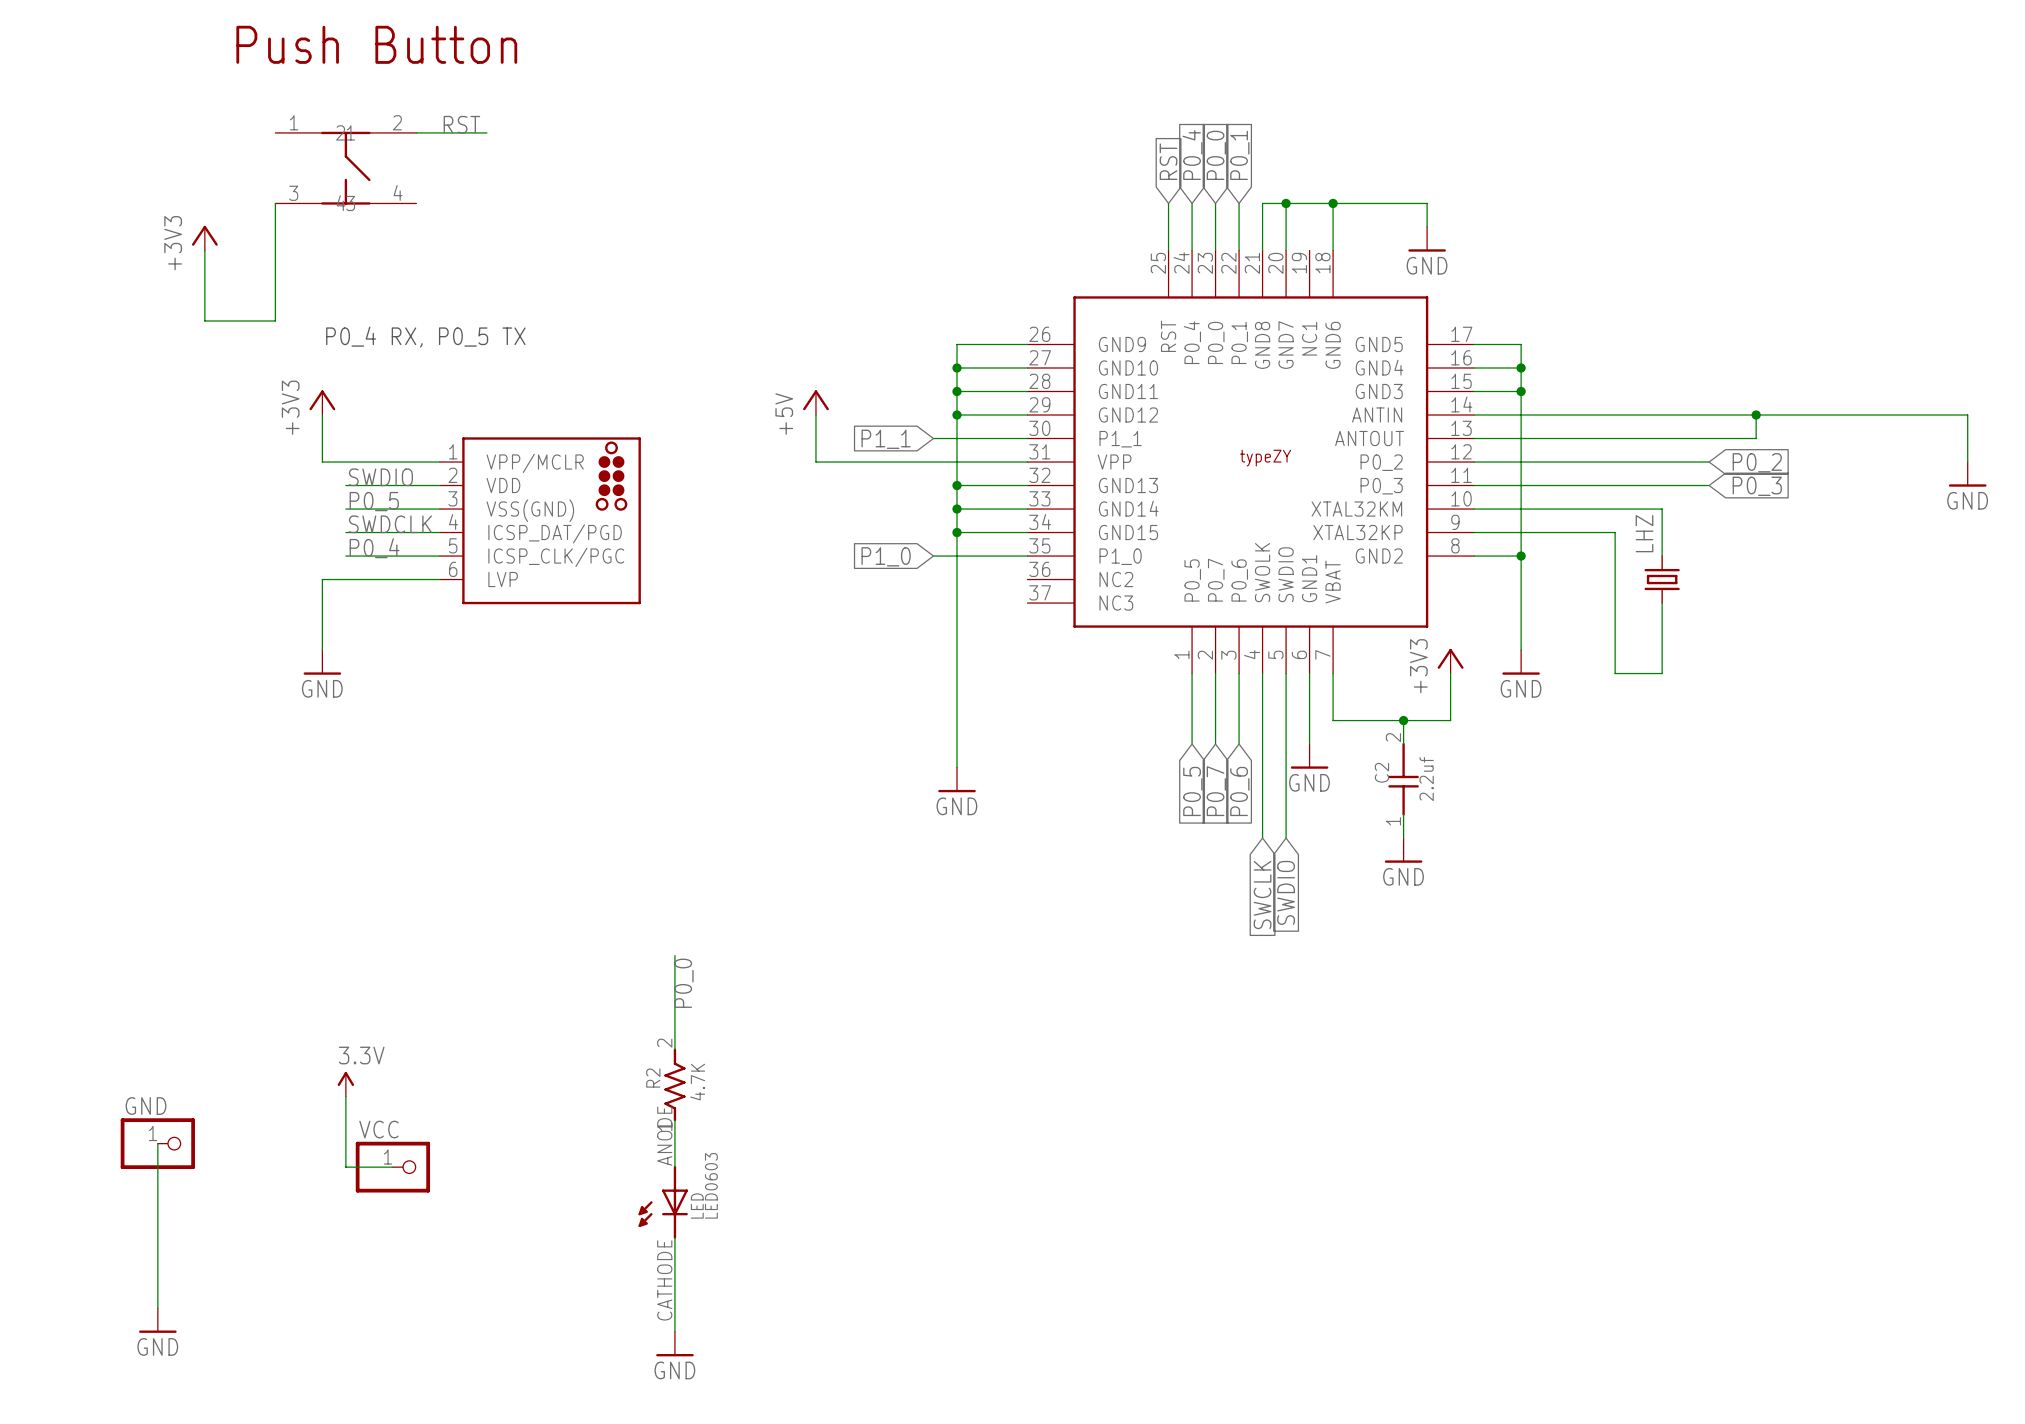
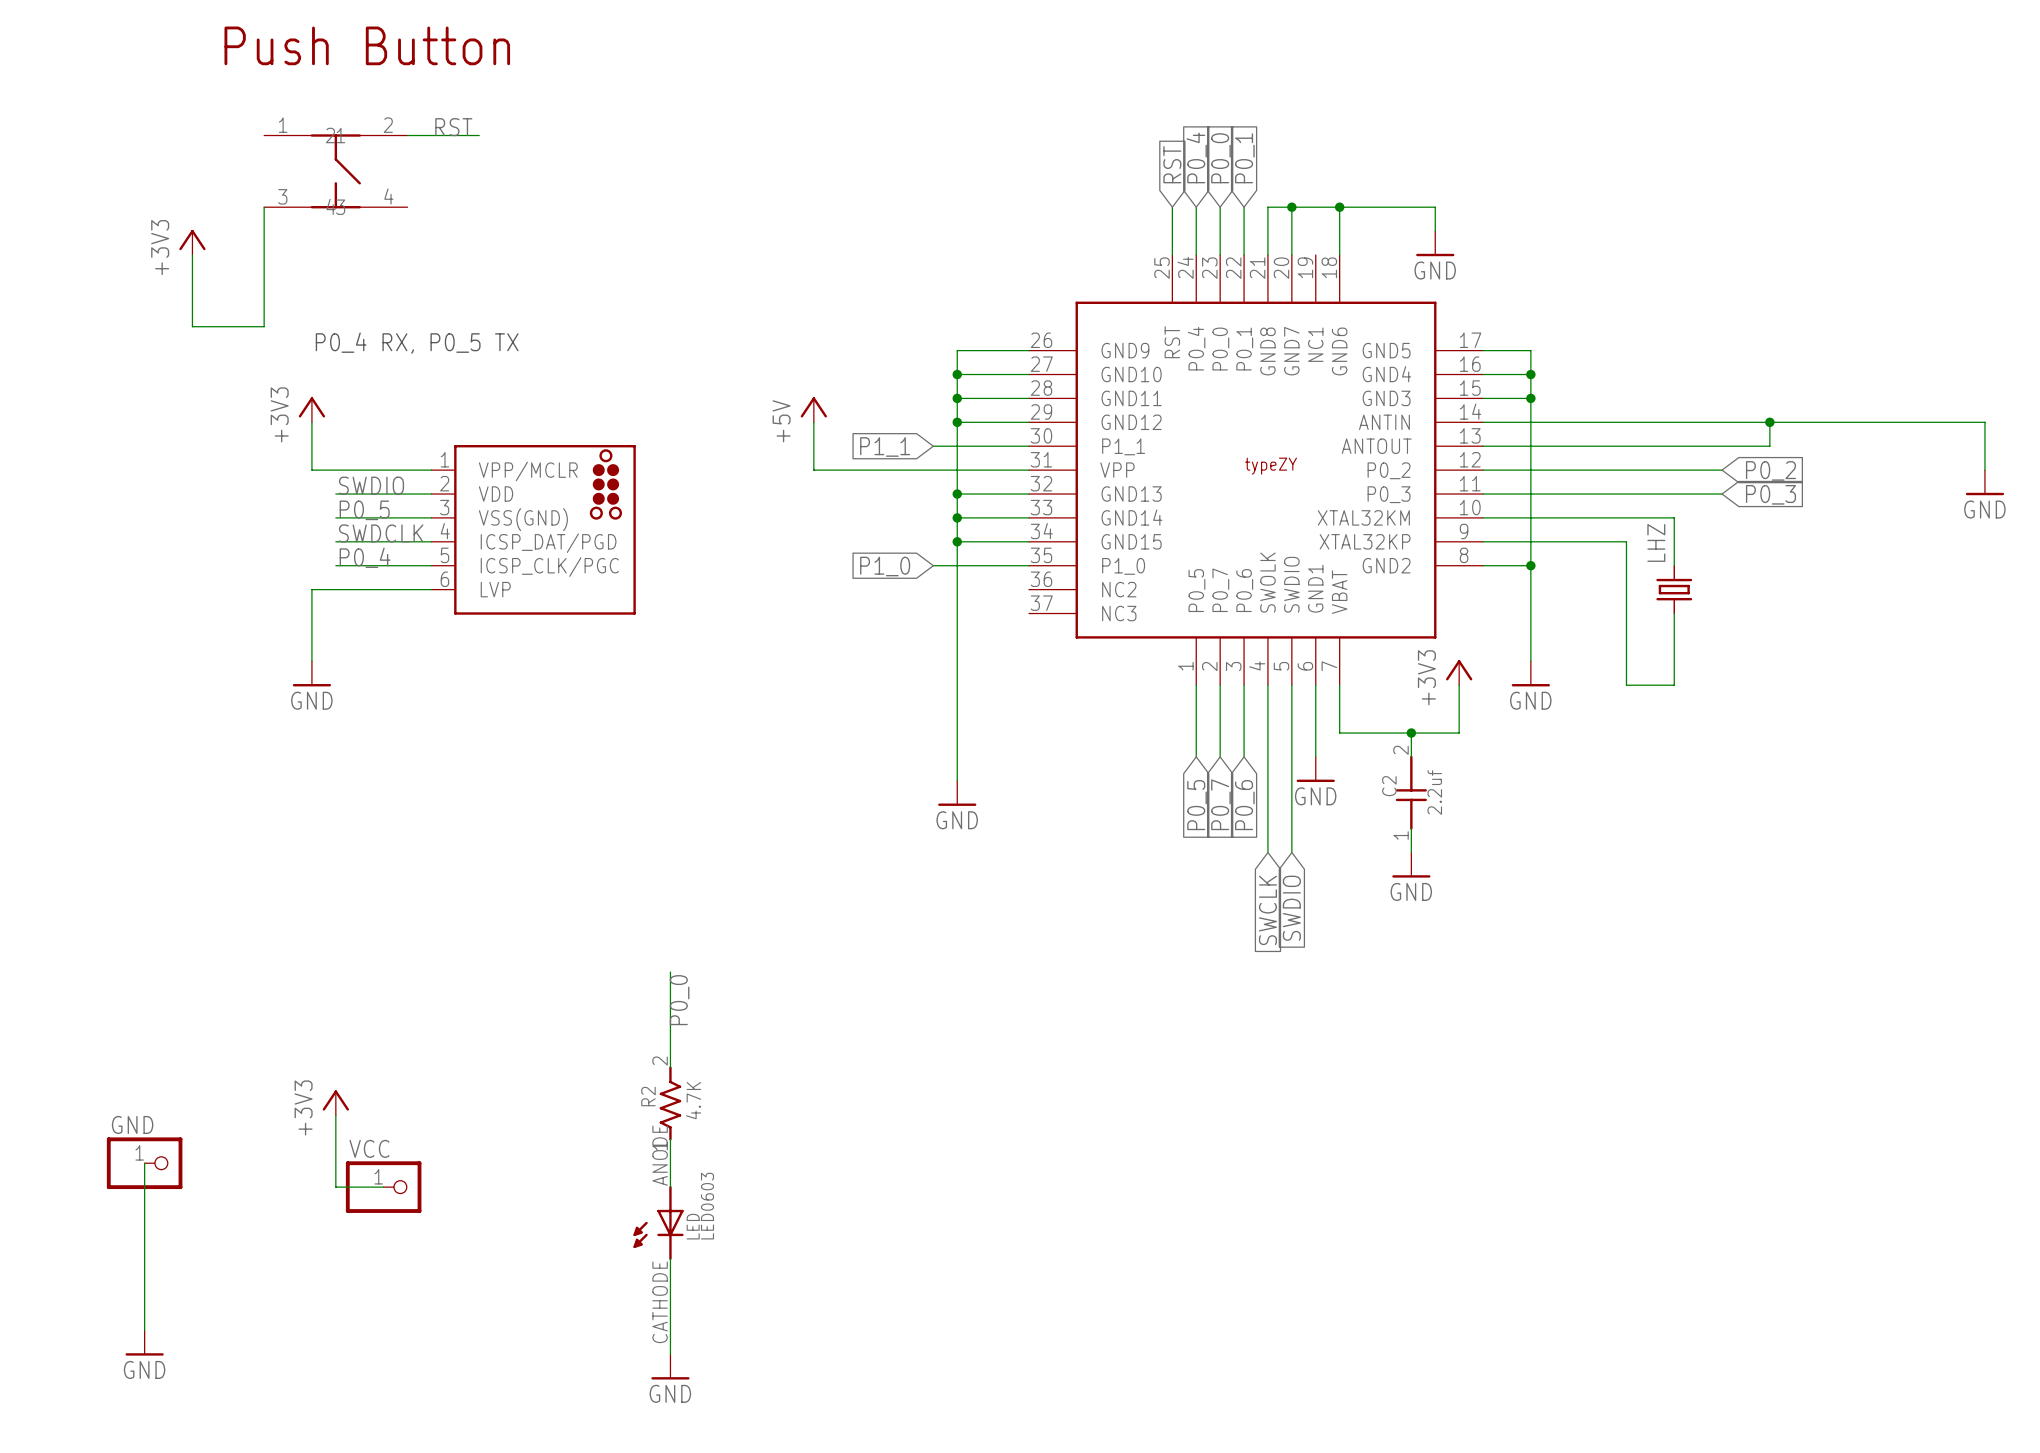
power symbol: 3.3V (345, 1084) -> +3V3 (335, 1102)

